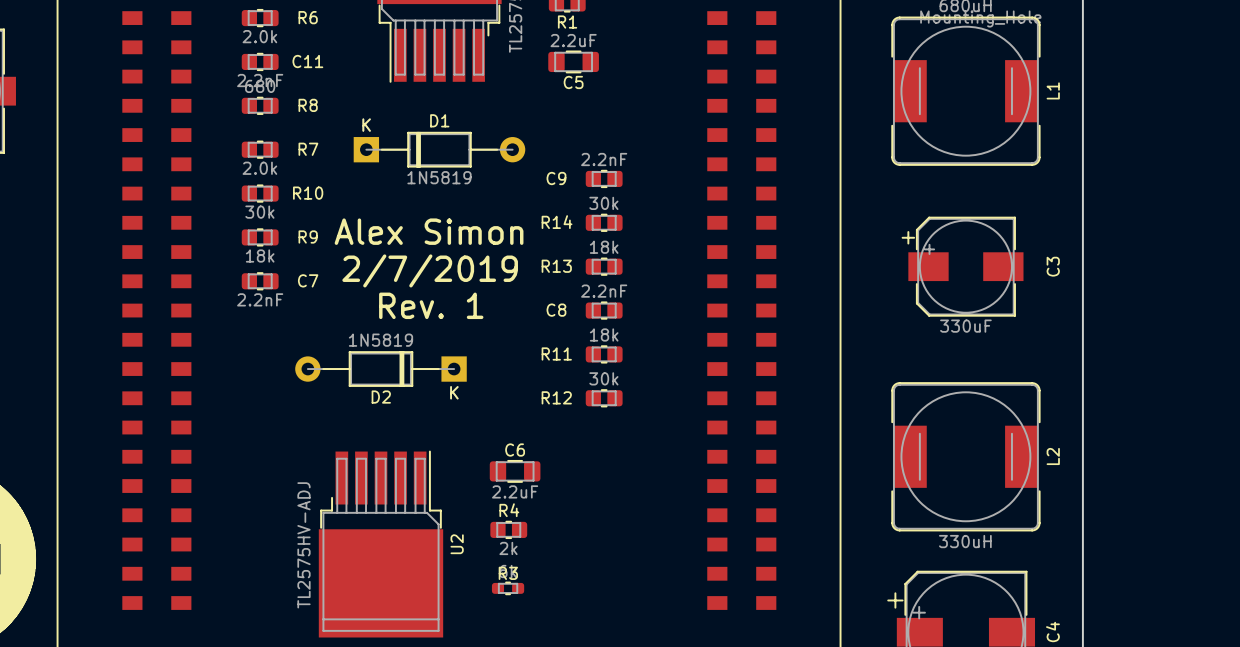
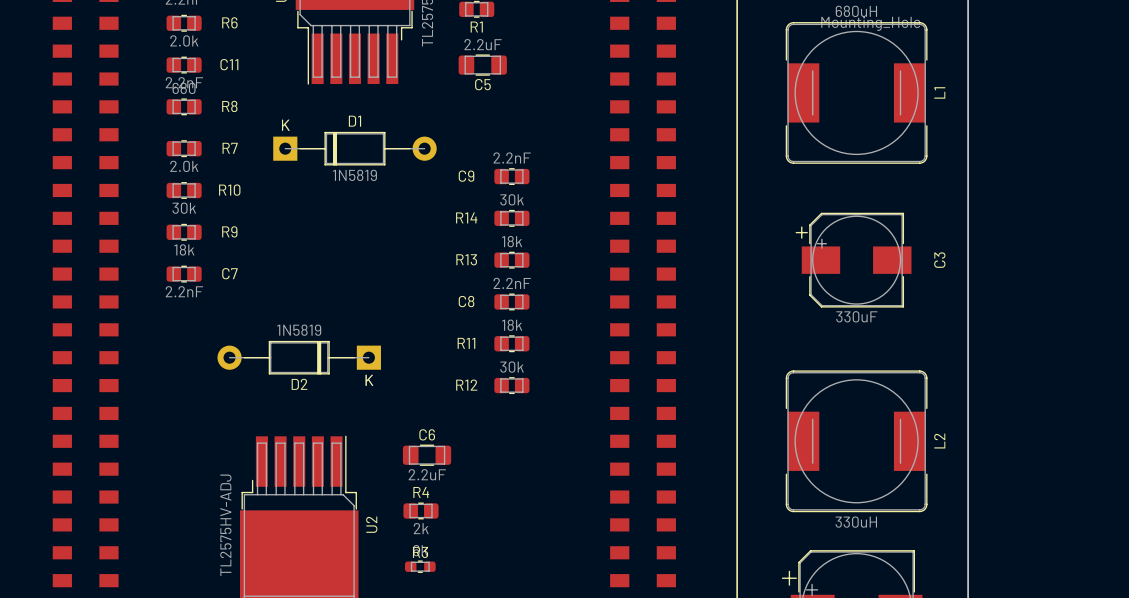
text: Alex Simon (429, 231) -> none
text: 2/7/2019 (430, 270) -> none
text: Rev. 1 (431, 305) -> none

